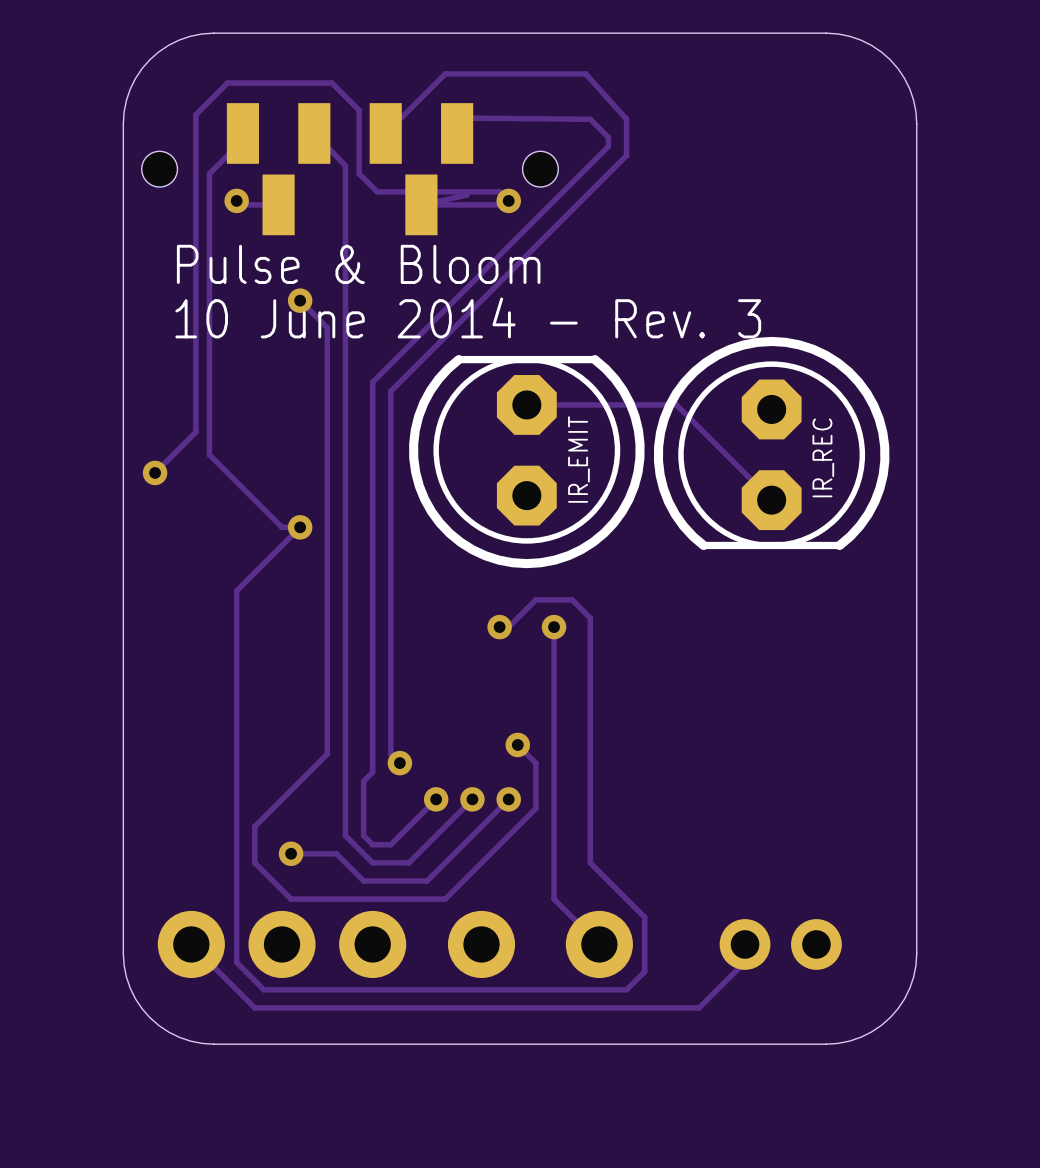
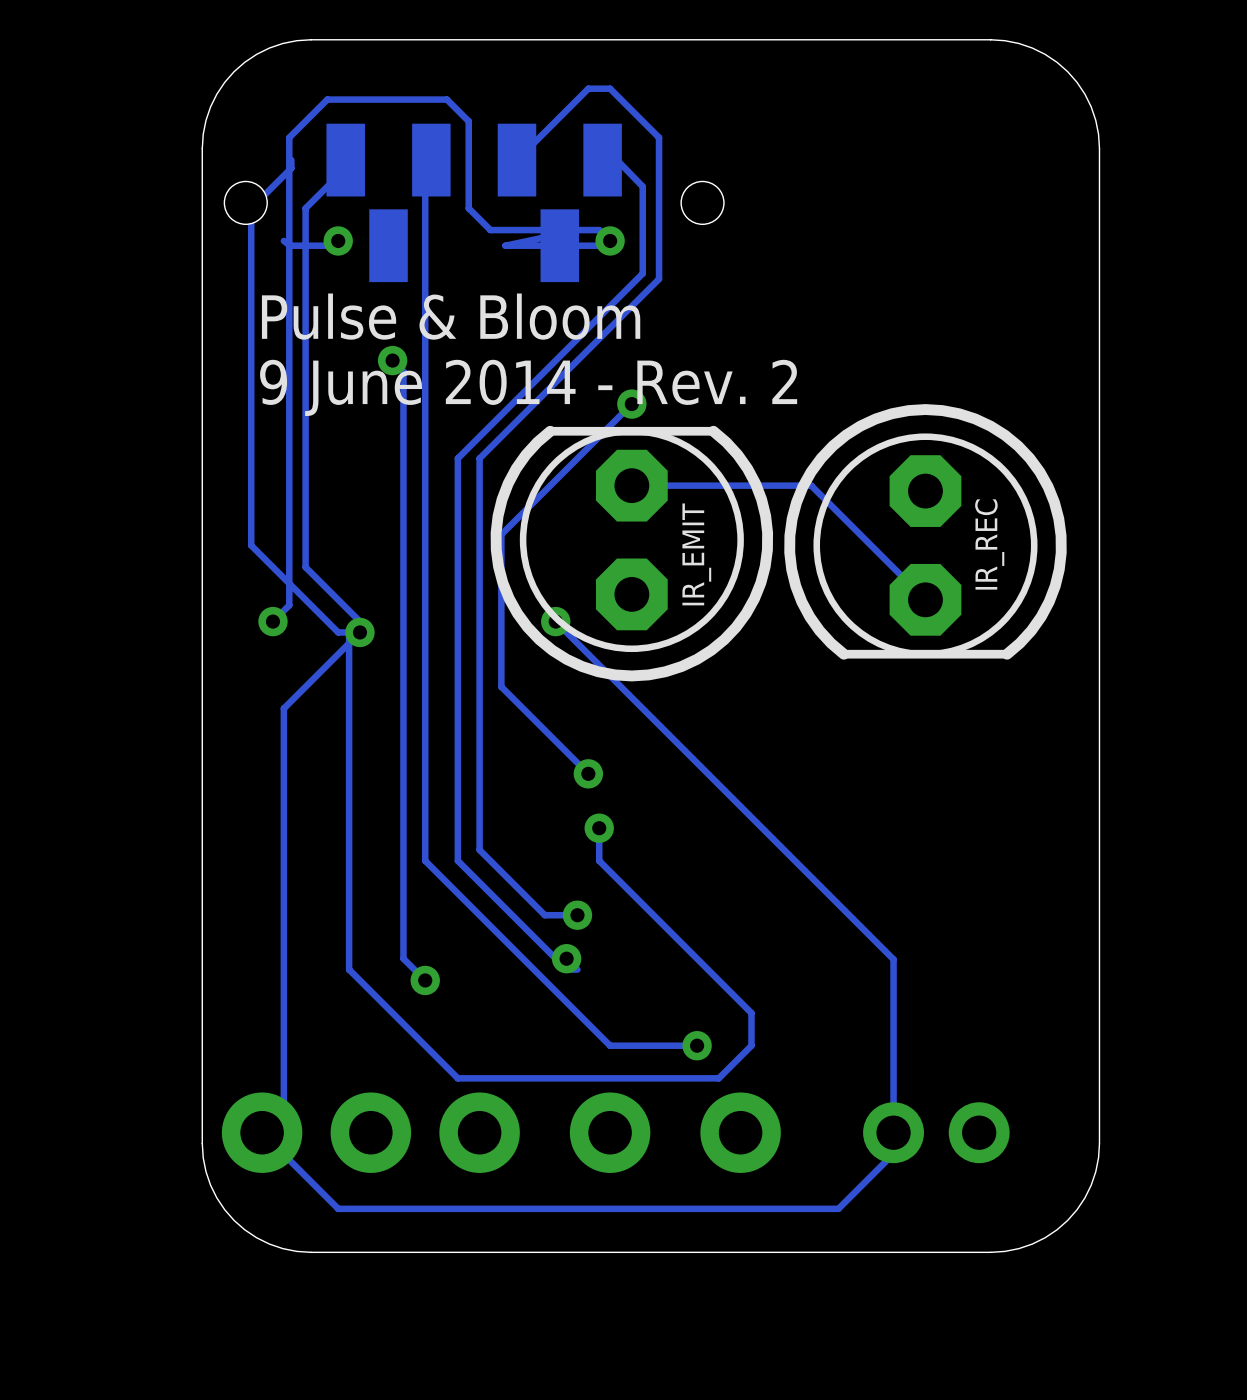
board edge: (259, 33) (202, 33) (190, 36) (168, 45) (149, 59) (135, 78) (126, 100) (123, 123) (124, 965) (130, 988) (142, 1008) (149, 1017) (168, 1032) (190, 1041) (202, 1043) (259, 1044) -> (311, 39) (282, 43) (269, 48) (244, 62) (234, 71) (224, 82) (210, 106) (205, 120) (202, 148) (203, 1157) (210, 1185) (224, 1209) (234, 1220) (244, 1229) (269, 1244) (282, 1248) (311, 1252)
track: (490, 73) (445, 73) (385, 133) -> (588, 88) (516, 160)
track: (508, 73) (585, 73) (626, 119) (626, 155) (549, 232) -> (610, 88) (659, 137) (659, 279)
track: (272, 83) (227, 83) (195, 114) (195, 432) (155, 472) -> (327, 99) (289, 137) (289, 605) (272, 621)
track: (331, 83) (359, 110) (359, 173) (377, 191) (408, 191) -> (398, 99) (446, 99) (468, 121) (468, 208) (490, 230)
track: (314, 133) (345, 165) (345, 835) (372, 862) (408, 862) (472, 799) -> none
track: none -> (431, 160) (425, 166) (425, 860) (468, 904)
track: (457, 133) (472, 118) (590, 119) (608, 137) (608, 146) (372, 382) (372, 772) (363, 781) (363, 835) (372, 844) (390, 844) (436, 799) -> none
track: none -> (602, 160) (599, 141) (642, 186) (642, 273) (457, 458) (457, 860) (566, 969) (577, 969)
part position: (350, 169) -> (474, 202)
via position: (236, 200) -> (338, 240)
text position: Pulse & Bloom (358, 264) -> Pulse & Bloom (451, 316)
track: (300, 300) (327, 327) (327, 754) (254, 826) (254, 862) (291, 899) (381, 899) -> none
via position: (300, 300) -> (392, 360)
track: none -> (392, 360) (403, 371) (403, 958) (425, 980)
text: 10 June 2014 - Rev. 3 (468, 317) -> 9 June 2014 - Rev. 2 (528, 387)
track: none -> (631, 404) (501, 534) (501, 686) (588, 773)
via: none -> (631, 404)
track: (399, 382) (390, 391) (390, 754) -> (479, 458) (479, 849) (544, 915) (577, 915)
via position: (155, 472) -> (272, 621)
track: none -> (555, 621) (893, 959) (893, 1132)
via: none -> (555, 621)
track: (499, 627) (508, 627) (535, 599) (572, 599) (590, 618) (590, 862) (644, 917) (644, 971) (626, 989) (263, 989) -> none
via position: (499, 627) -> (588, 773)
track: (554, 627) (554, 899) (599, 944) -> none
via: (554, 627) -> none
via: none -> (599, 828)
track: (517, 744) (535, 763) (535, 808) (445, 899) -> (599, 828) (599, 860) (751, 1013) (751, 1045) (718, 1078) (533, 1078)
via: (517, 744) -> none
track: none -> (479, 915) (610, 1045) (697, 1045)
via: (399, 763) -> none
via: none -> (577, 915)
via: (436, 799) -> none
track: (508, 799) (427, 880) (363, 880) -> (457, 1078) (436, 1056)
via: (508, 799) -> none
via: none -> (425, 980)
via: (291, 853) -> none
track: (336, 853) (291, 853) -> (403, 1023) (349, 969) (349, 632) (359, 621) (305, 567) (305, 208) (345, 168) (345, 160)
via: none -> (697, 1045)
track: (191, 944) (254, 1007) (282, 1007) -> (316, 1187) (338, 1208)
part position: (282, 944) -> (370, 1132)
part position: (481, 944) -> (610, 1132)
part position: (599, 944) -> (740, 1132)

